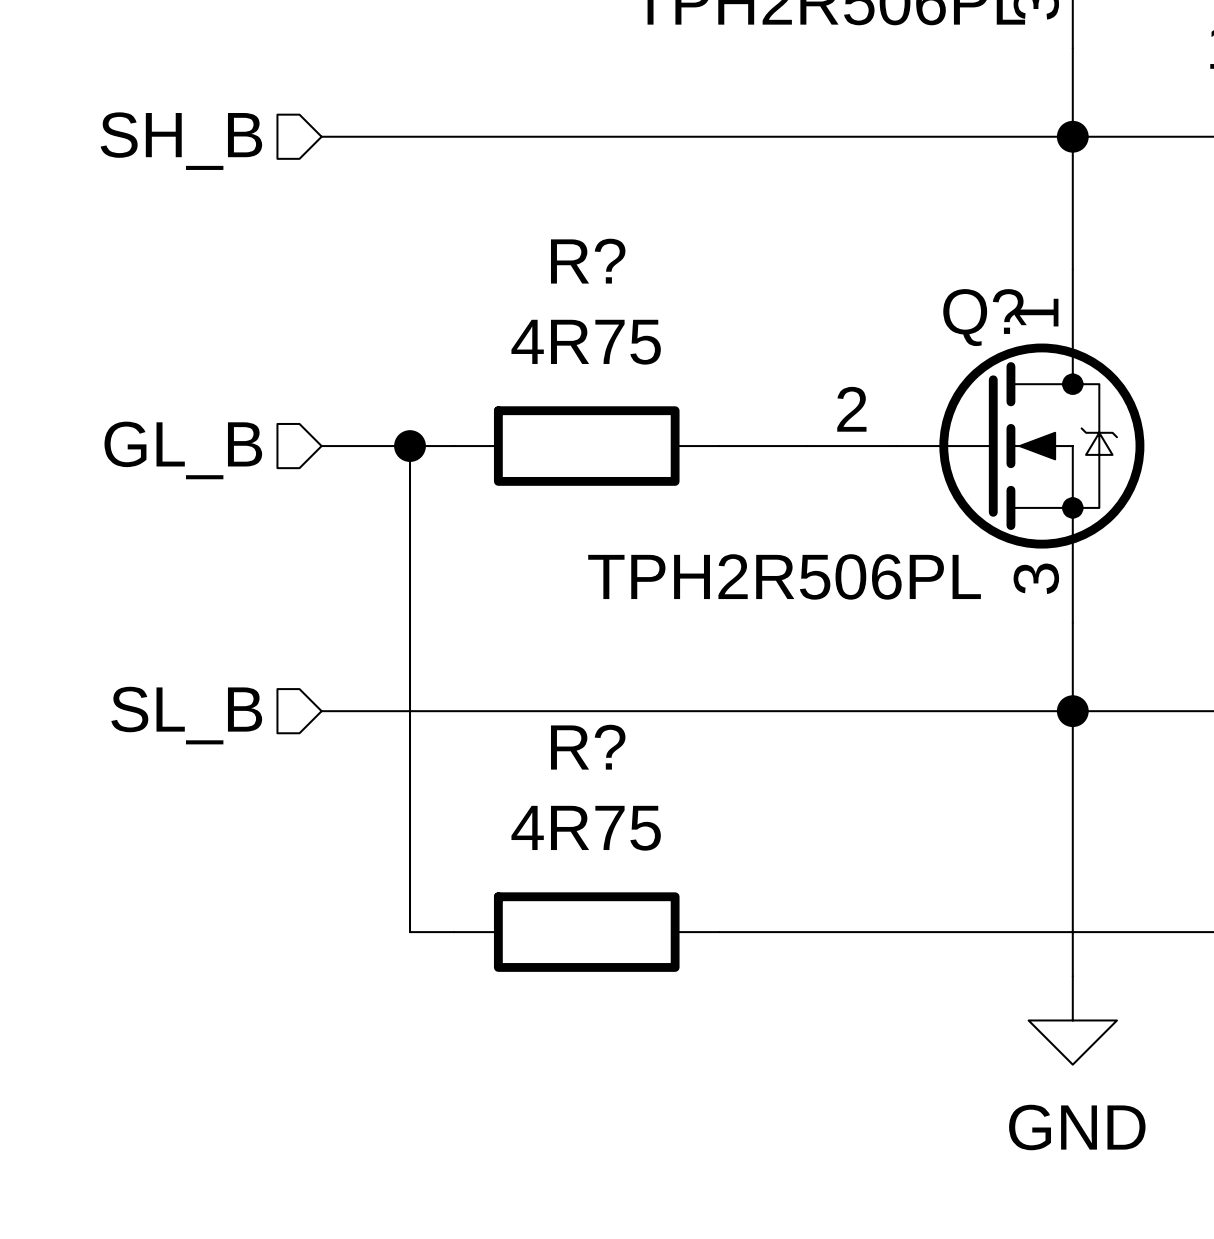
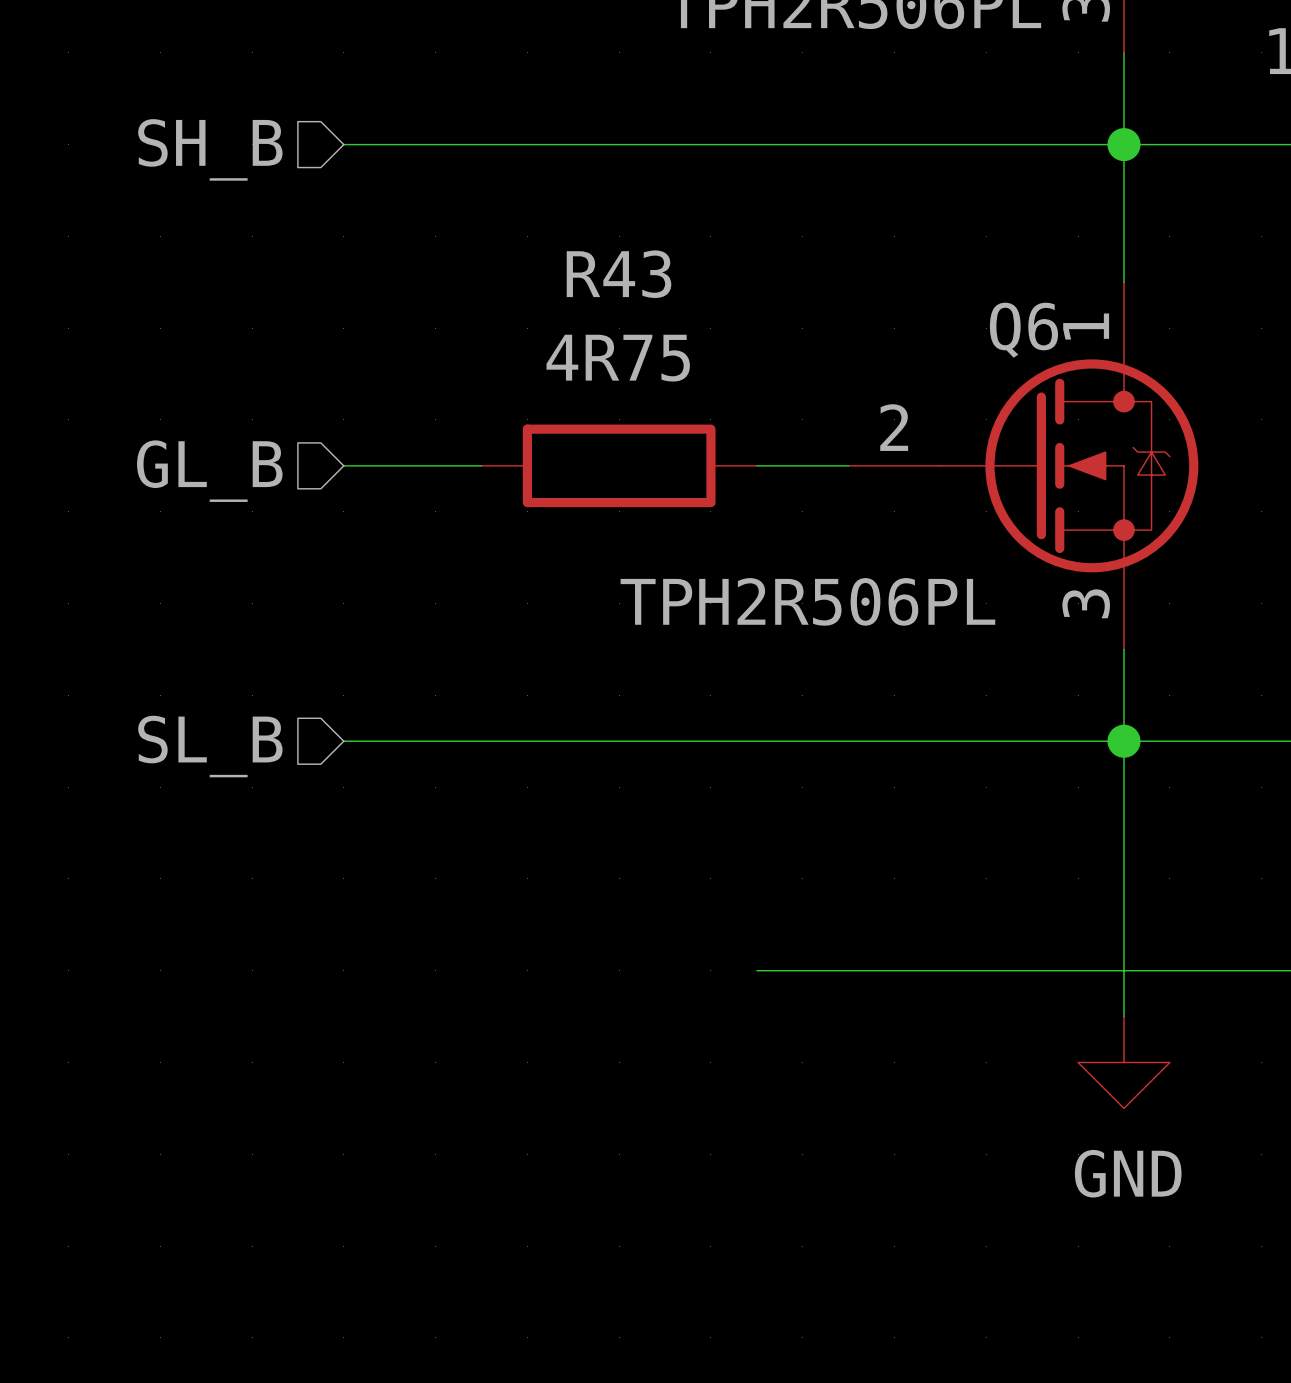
R? name: R? (588, 261) -> R43 (618, 274)
Q? name: Q? (983, 317) -> Q6 (1023, 330)
wire: (410, 446) (410, 932) (454, 932) -> none
junction: (410, 446) -> none
R?: 4R75 (586, 932) -> none

